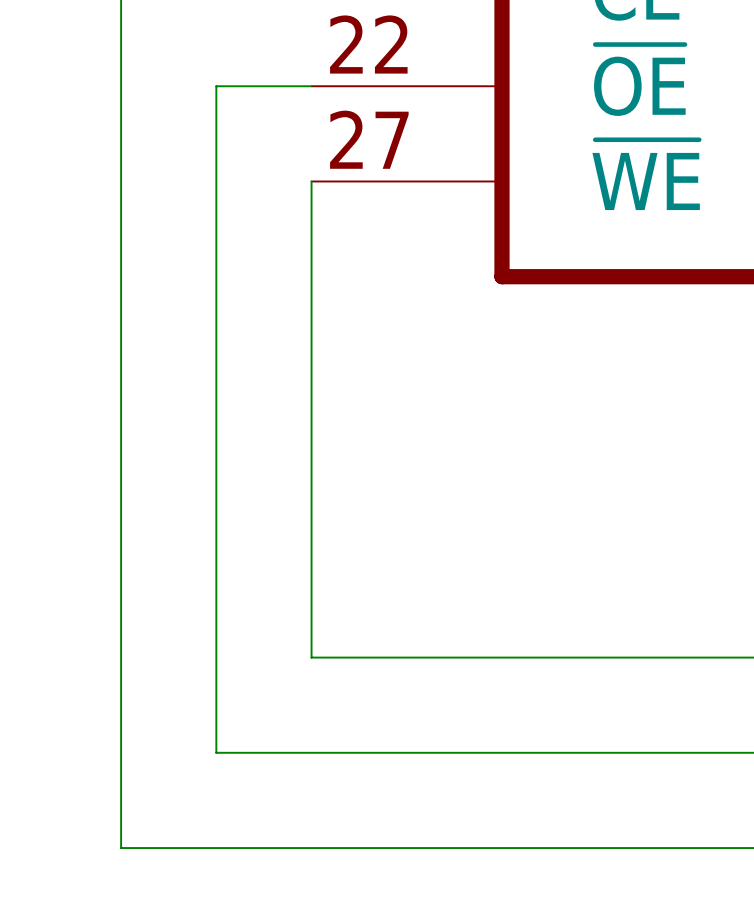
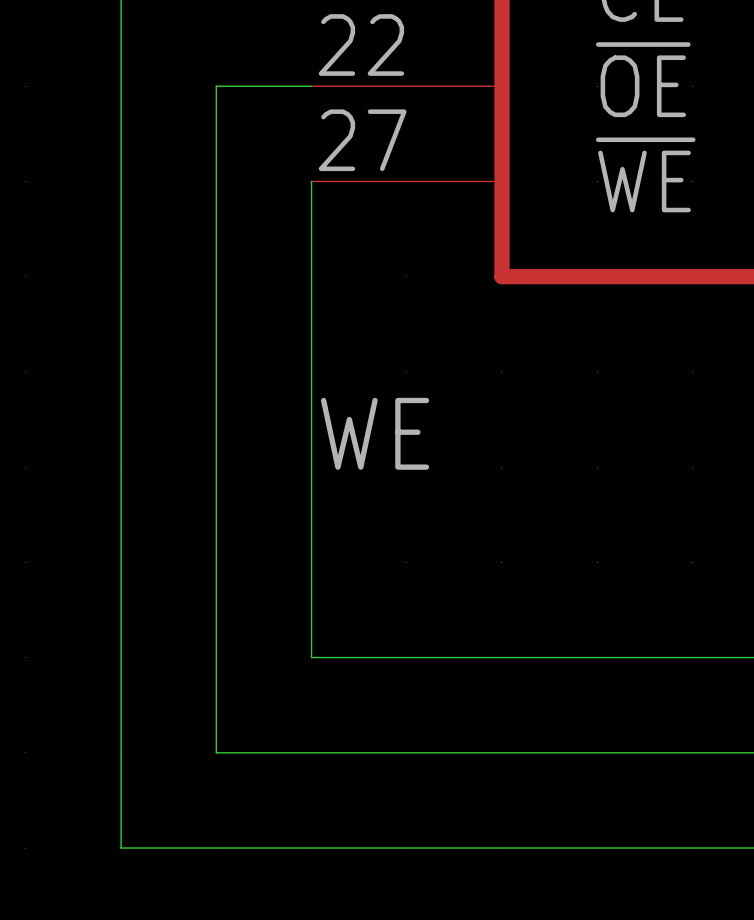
label: none -> WE (375, 433)

